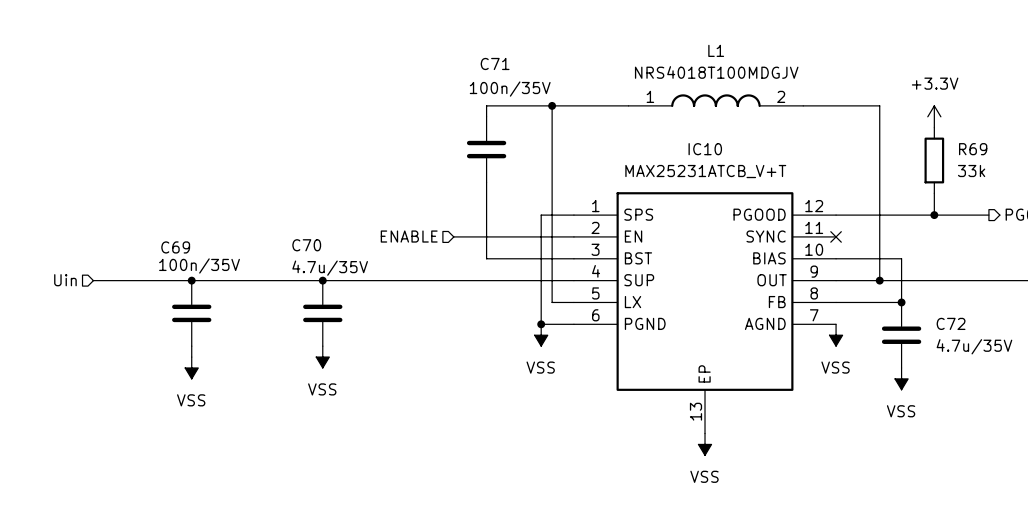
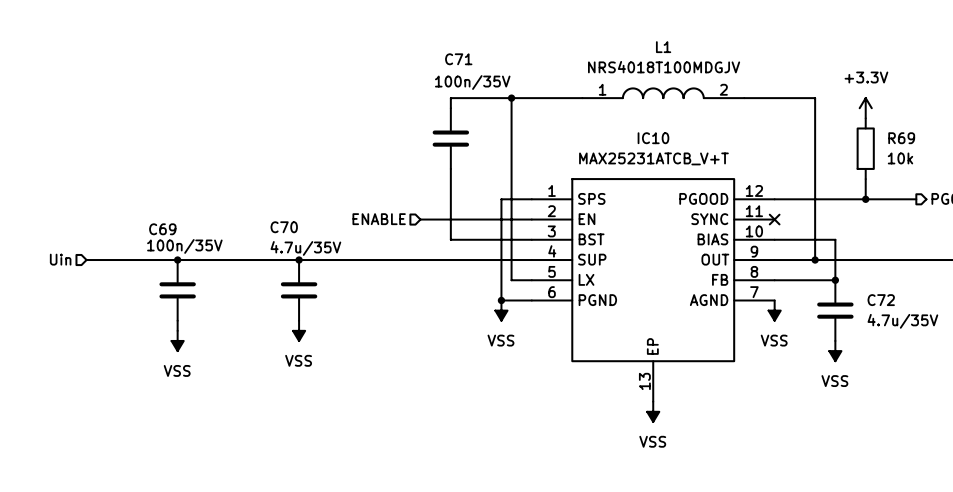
R69 value: 33k (971, 171) -> 10k (900, 158)

